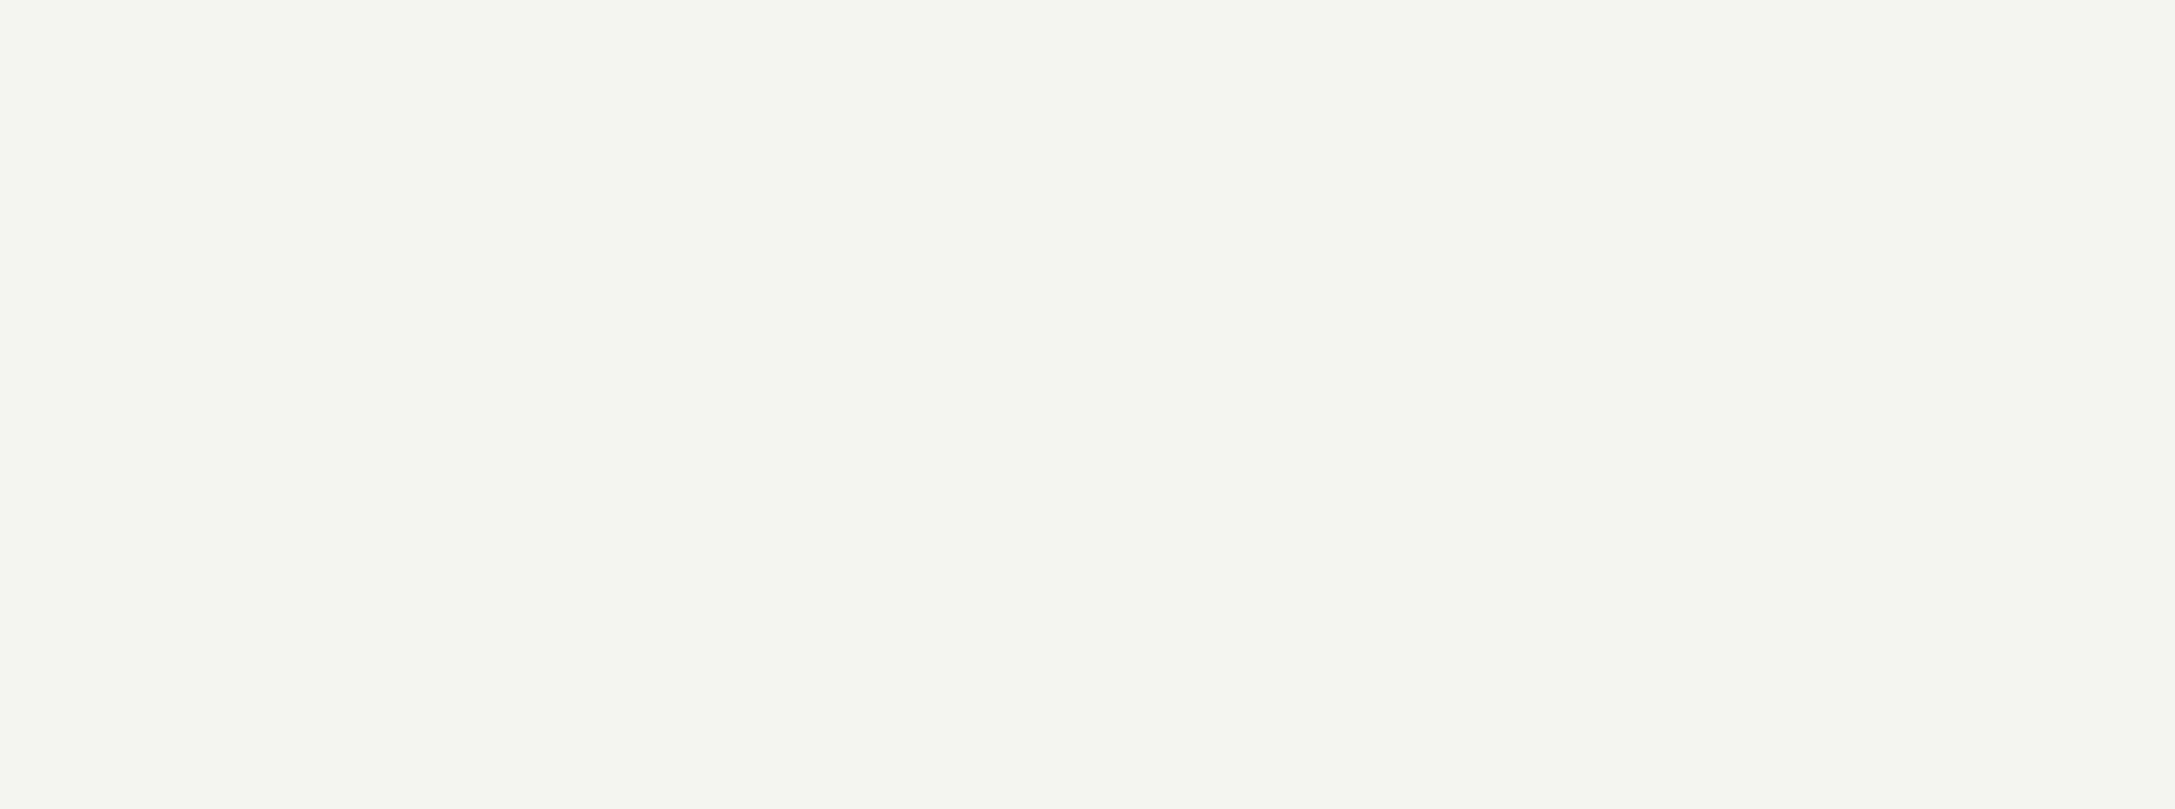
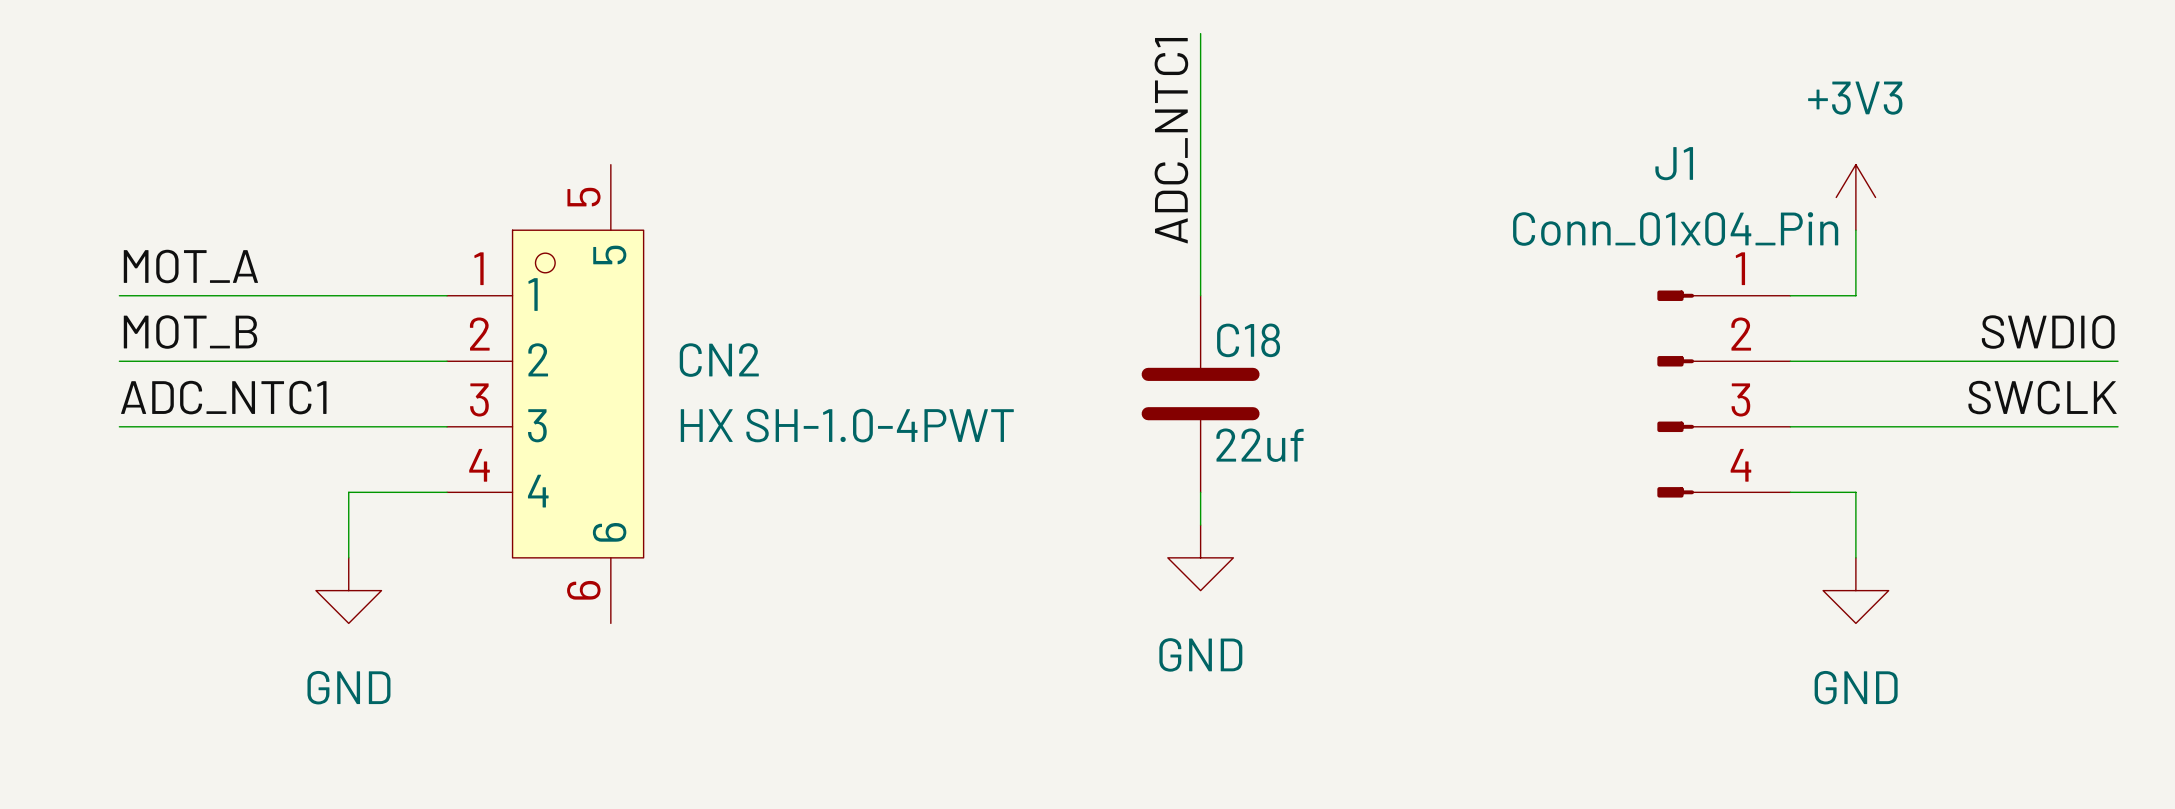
wire: none -> (1200, 33) (1200, 295)
label: none -> ADC_NTC1 (1171, 140)
power symbol: none -> +3V3 (1855, 197)
wire: none -> (1855, 230) (1855, 295) (1790, 295)
label: none -> MOT_A (190, 266)
wire: none -> (119, 295) (447, 295)
label: none -> MOT_B (190, 332)
label: none -> SWDIO (2048, 332)
wire: none -> (119, 361) (447, 361)
wire: none -> (1790, 361) (2118, 361)
CN2: none -> HX SH-1.0-4PWT (545, 394)
C18: none -> 22uf (1200, 394)
J1: none -> Conn_01x04_Pin (1723, 394)
label: none -> ADC_NTC1 (223, 397)
label: none -> SWCLK (2042, 397)
wire: none -> (119, 426) (447, 426)
wire: none -> (1790, 426) (2118, 426)
wire: none -> (447, 492) (348, 492) (348, 557)
wire: none -> (1200, 492) (1200, 525)
wire: none -> (1790, 492) (1855, 492) (1855, 557)
power symbol: none -> GND (1200, 557)
power symbol: none -> GND (348, 590)
power symbol: none -> GND (1855, 590)

